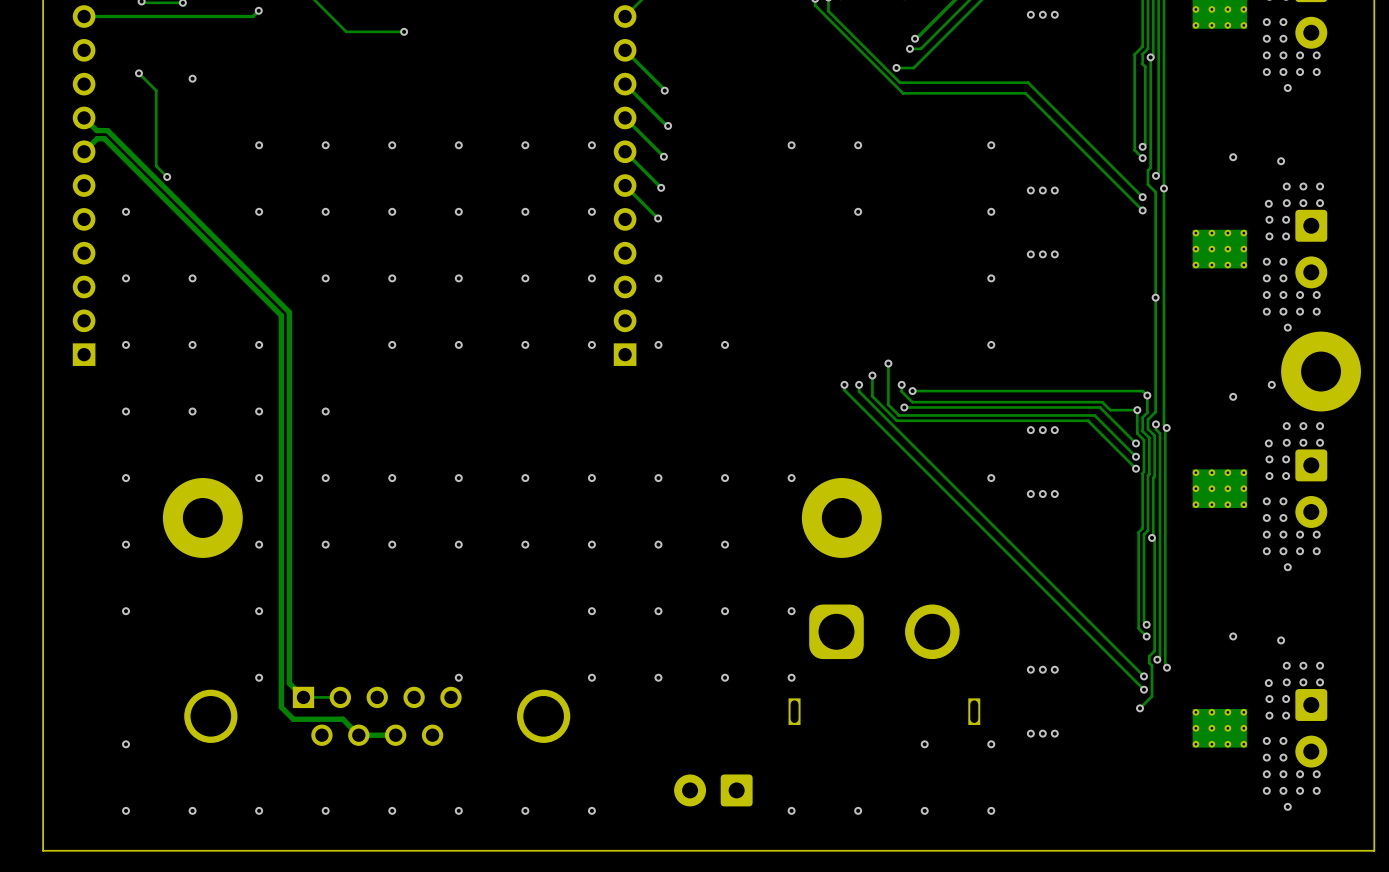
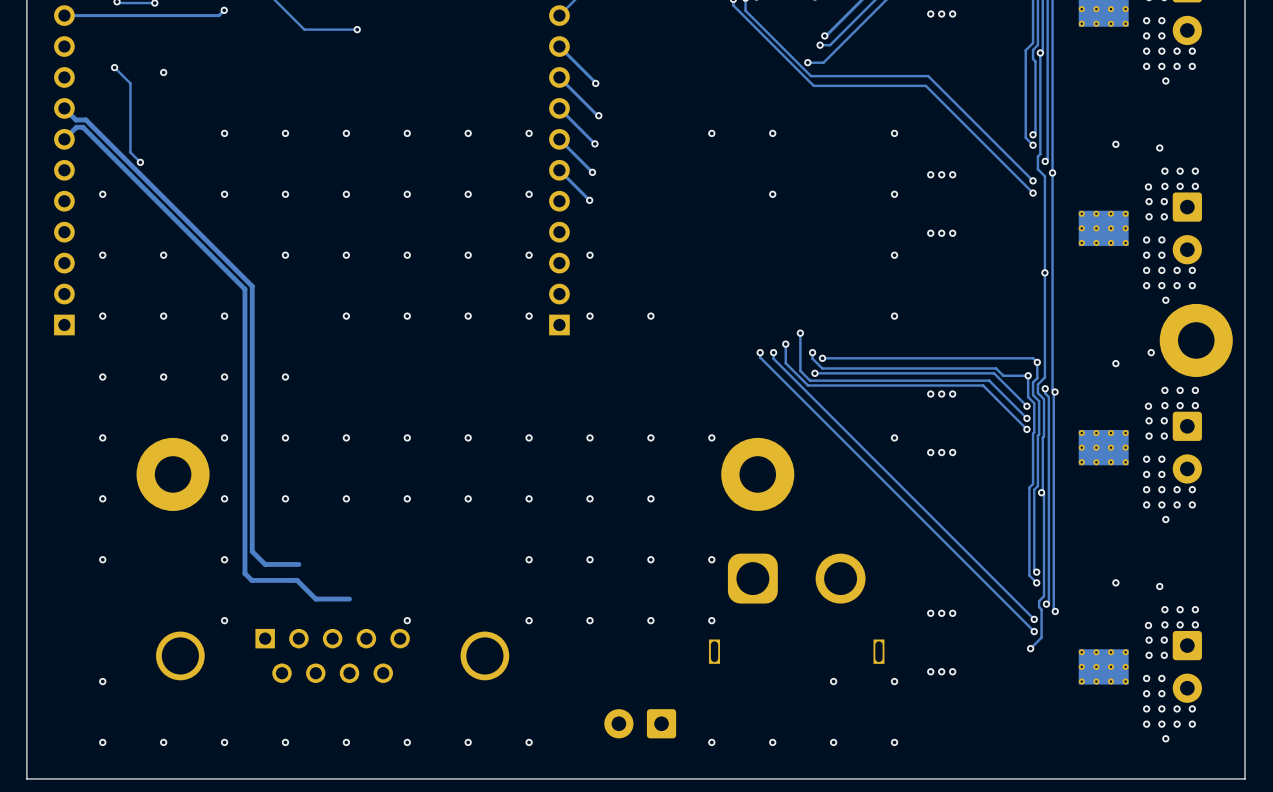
track: (289, 602) (289, 683) (303, 697) (340, 697) -> (252, 551) (265, 564) (298, 564)
track: (281, 626) (281, 707) (293, 719) (342, 719) (358, 735) (395, 735) -> (244, 573) (251, 580) (297, 580) (315, 599) (349, 599)

